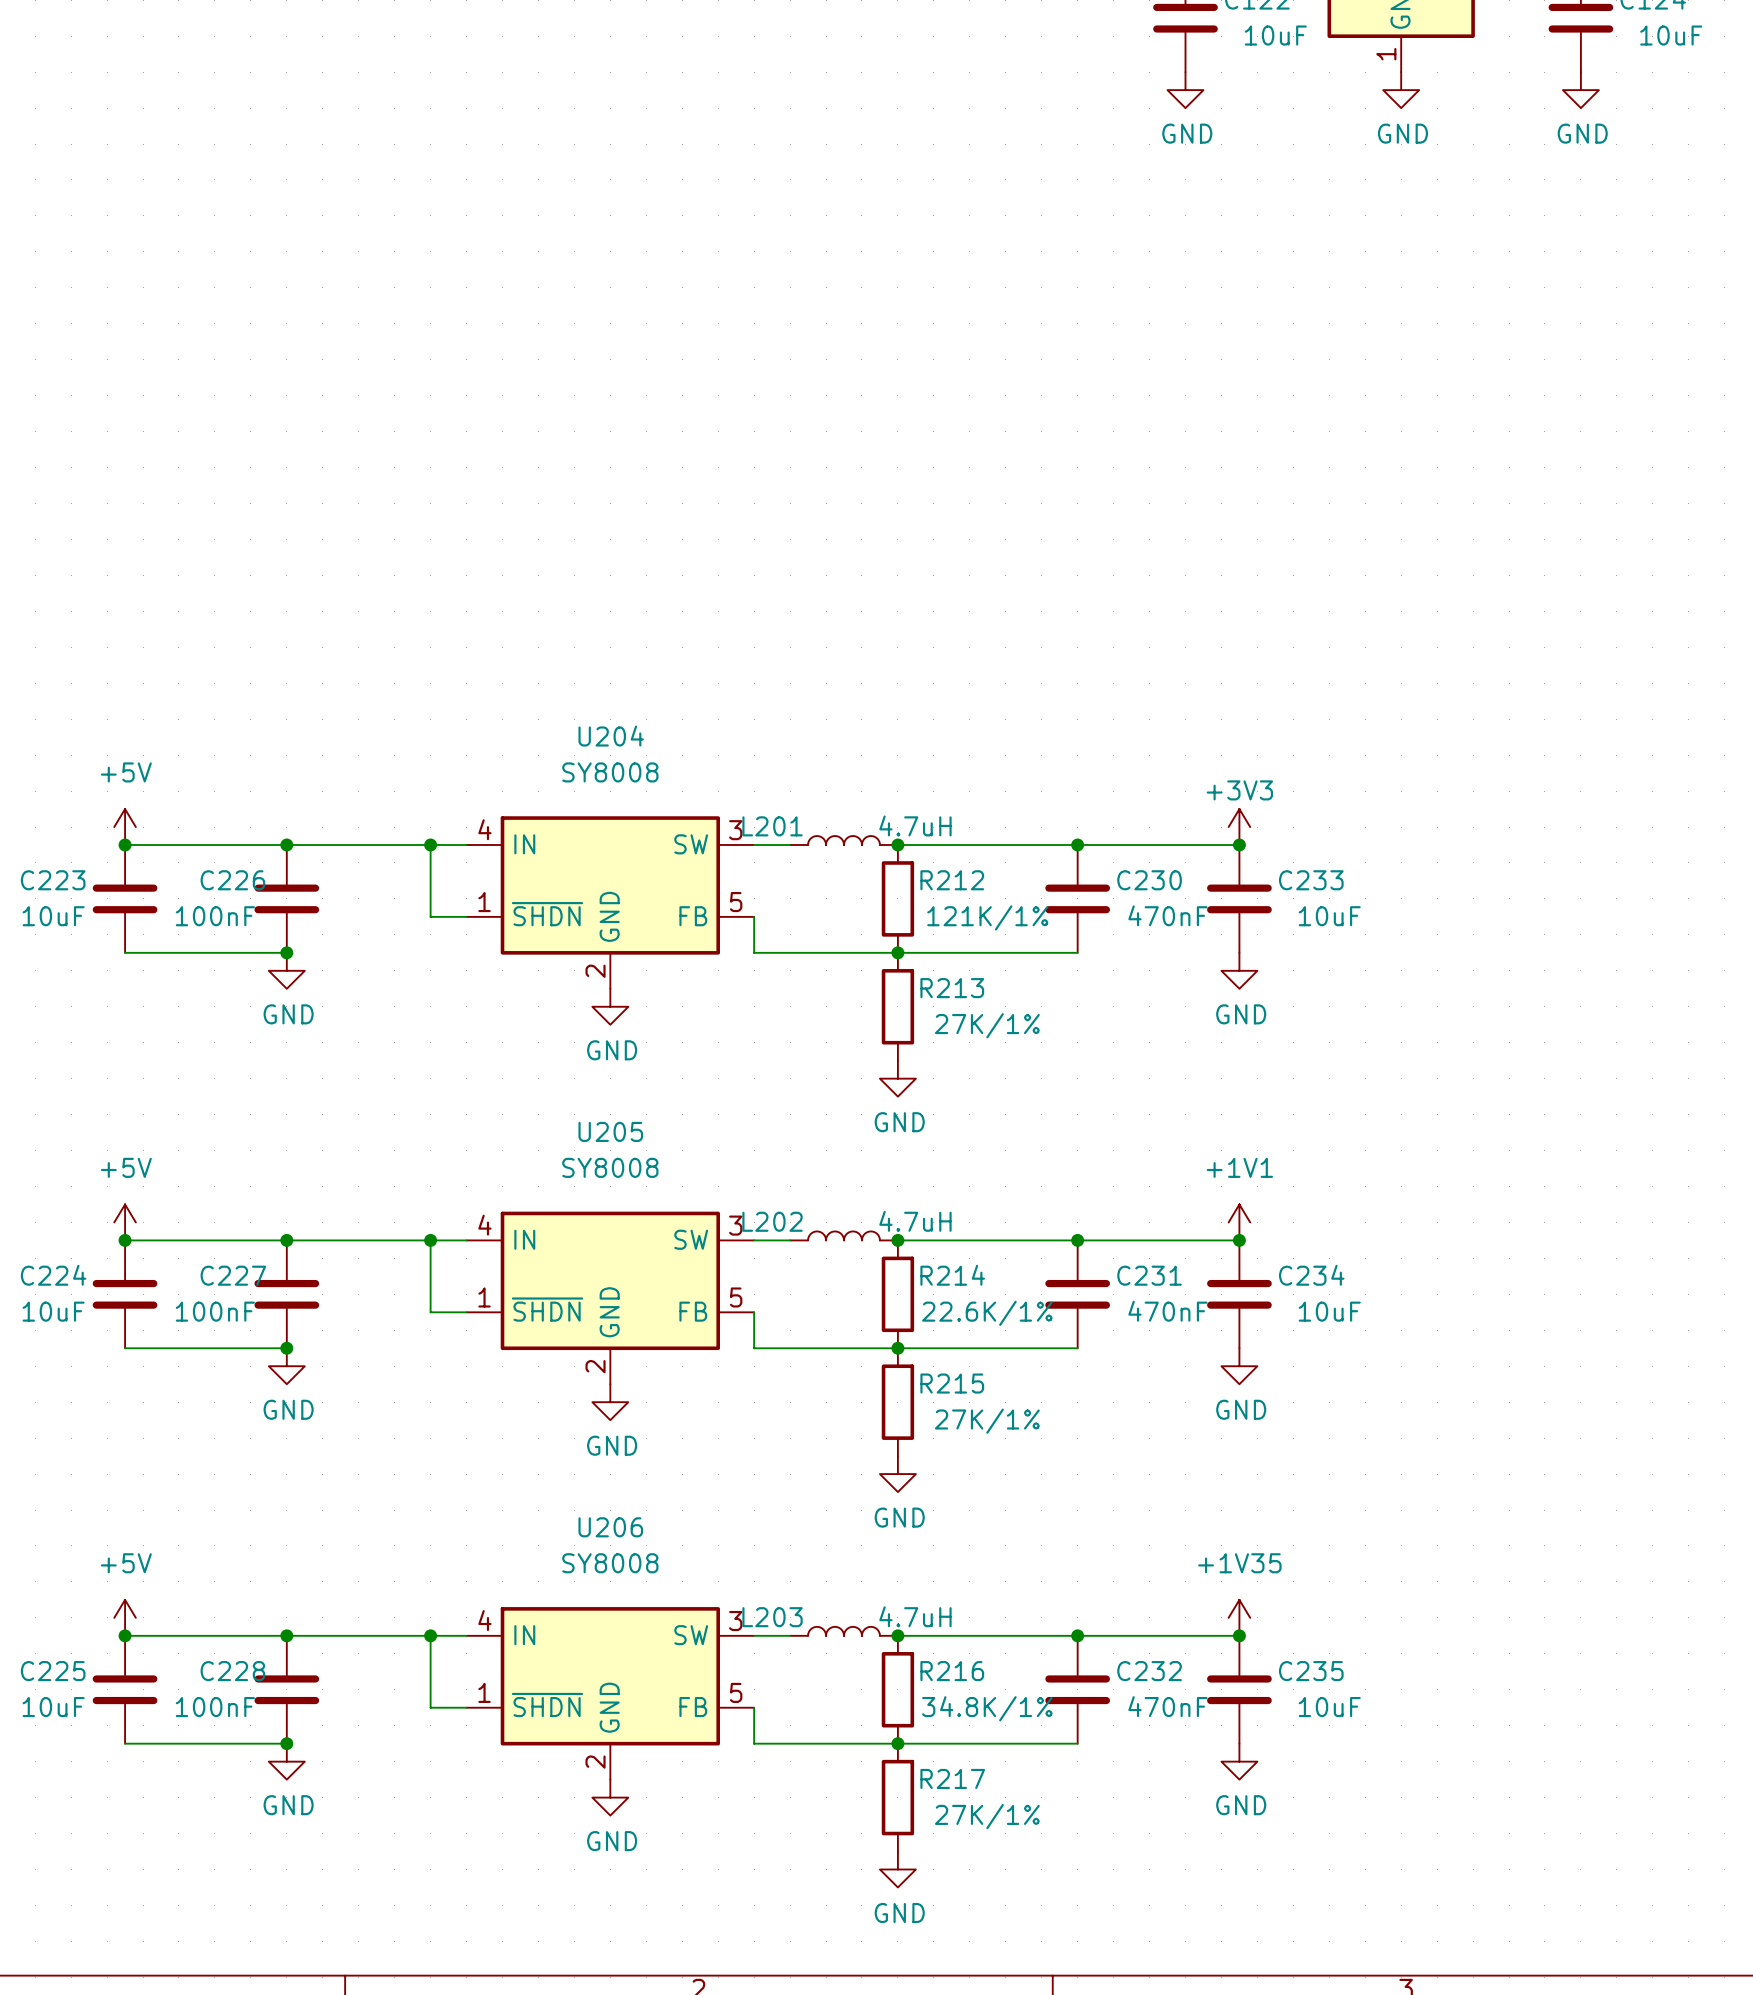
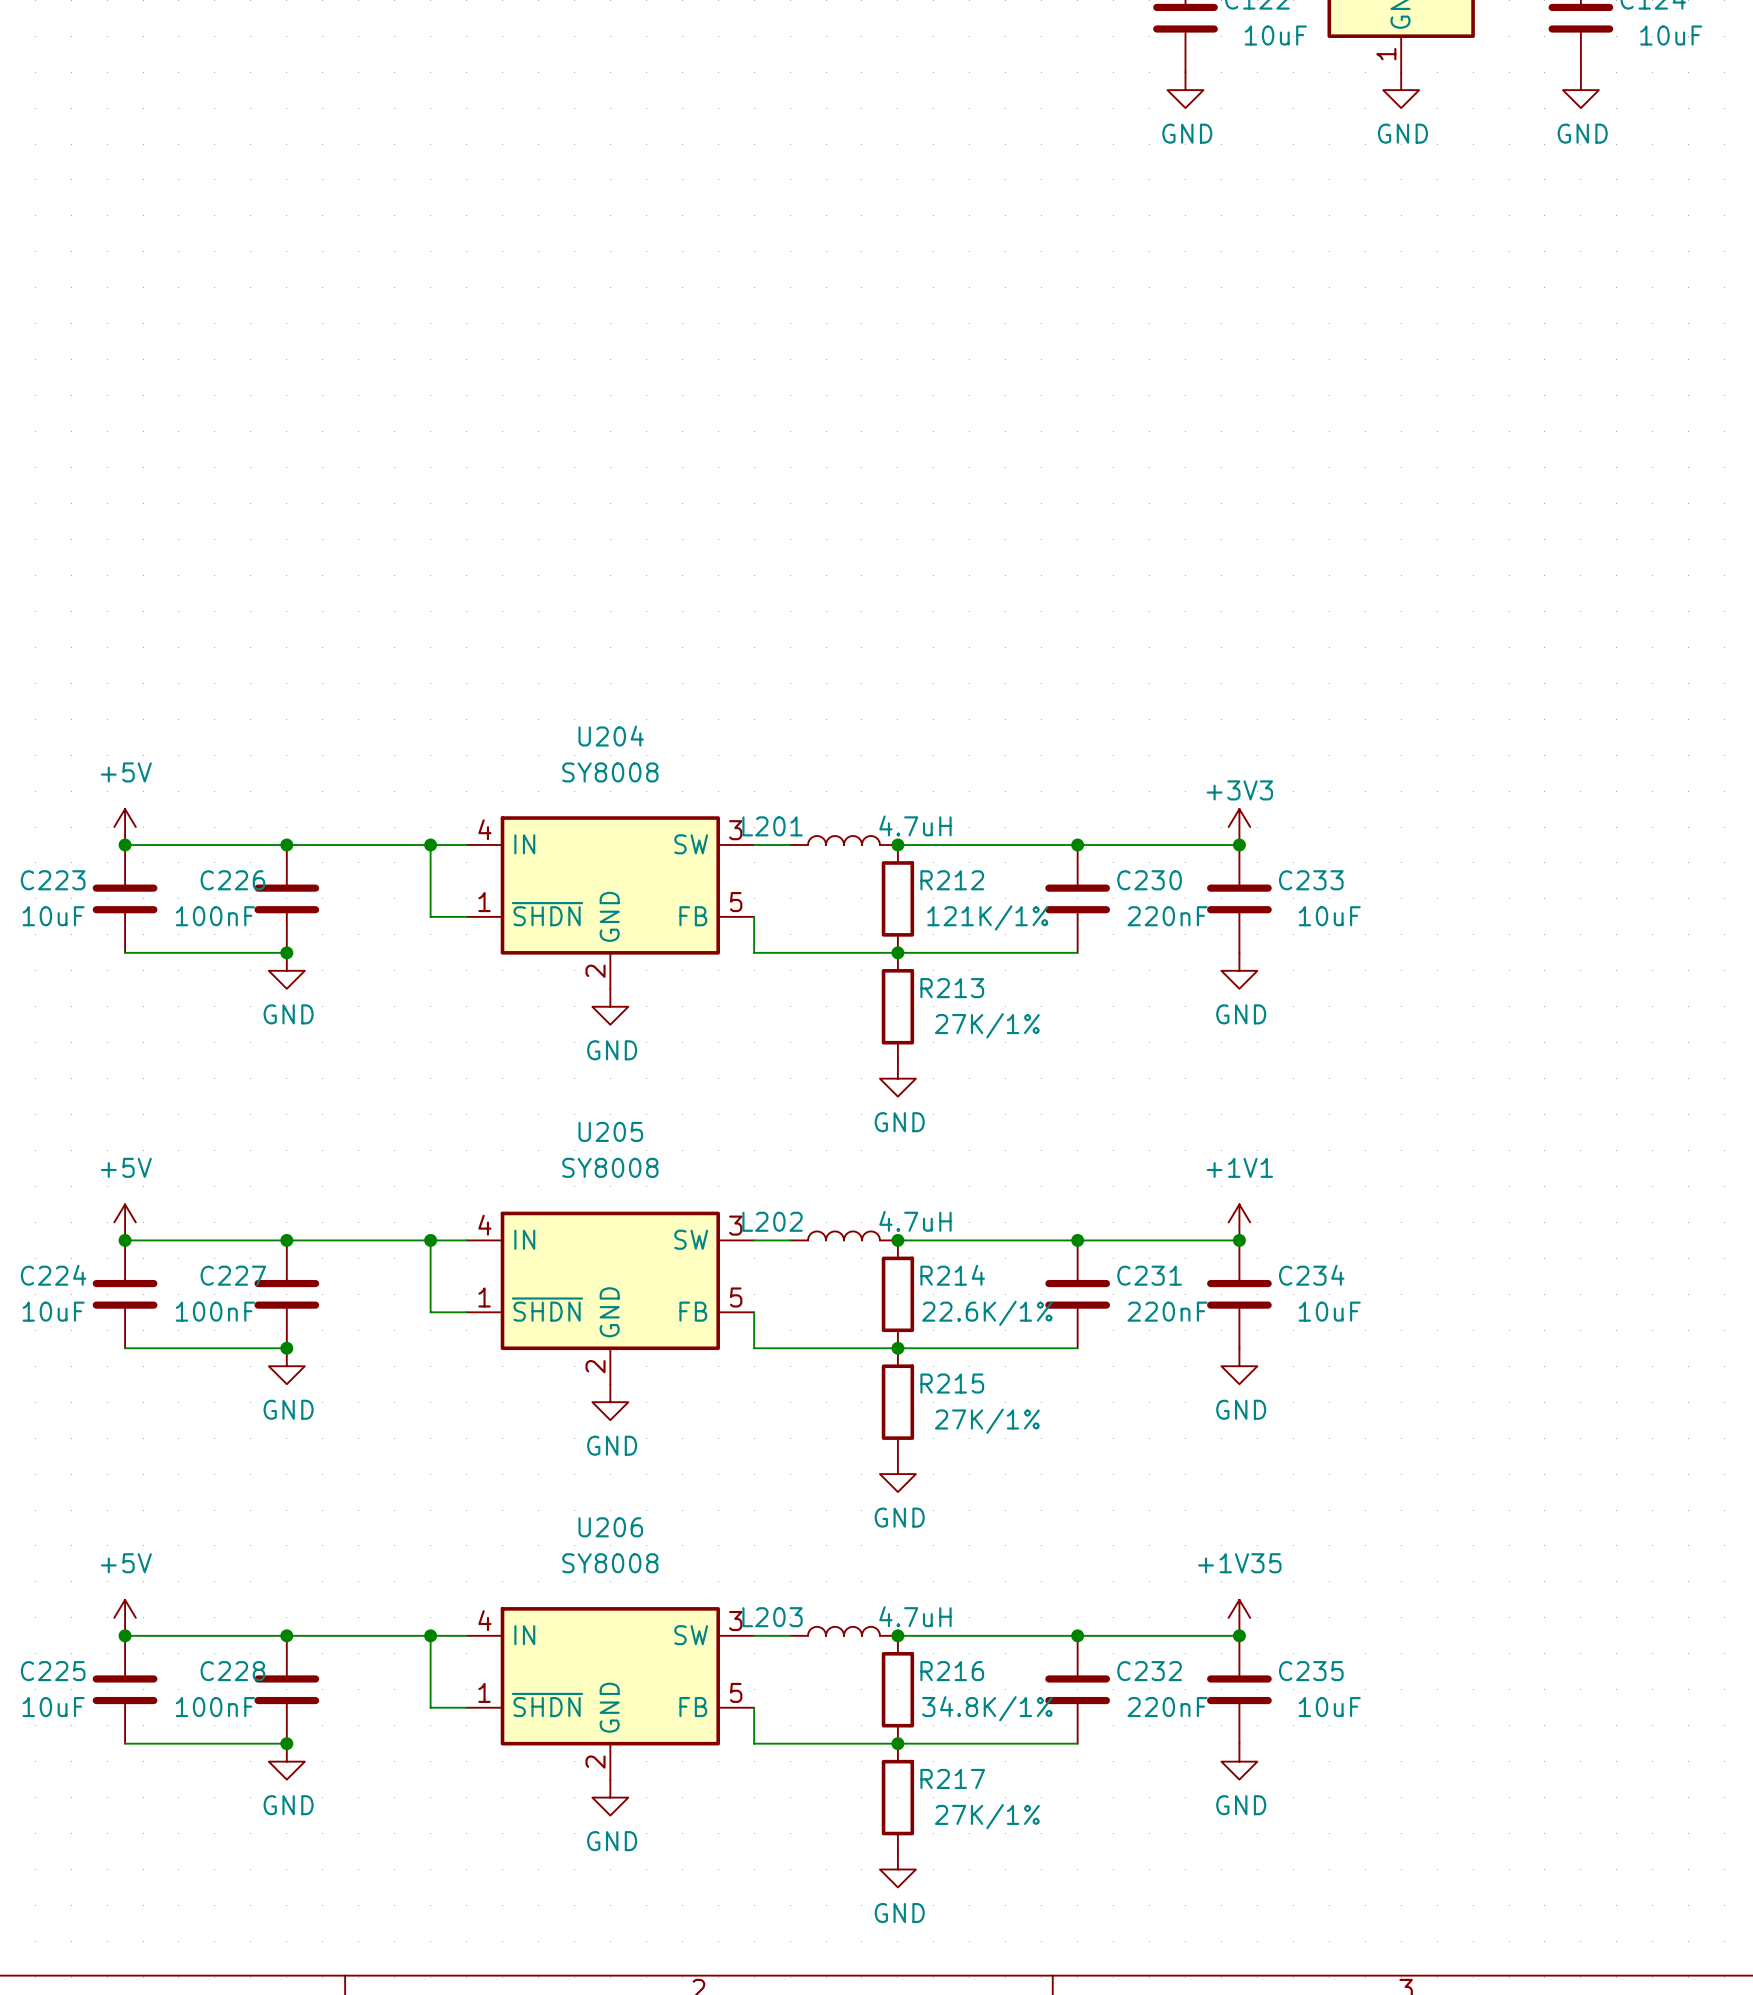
C230 value: 470nF (1167, 915) -> 220nF (1167, 916)
C231 value: 470nF (1167, 1311) -> 220nF (1167, 1311)
C232 value: 470nF (1167, 1706) -> 220nF (1167, 1707)

